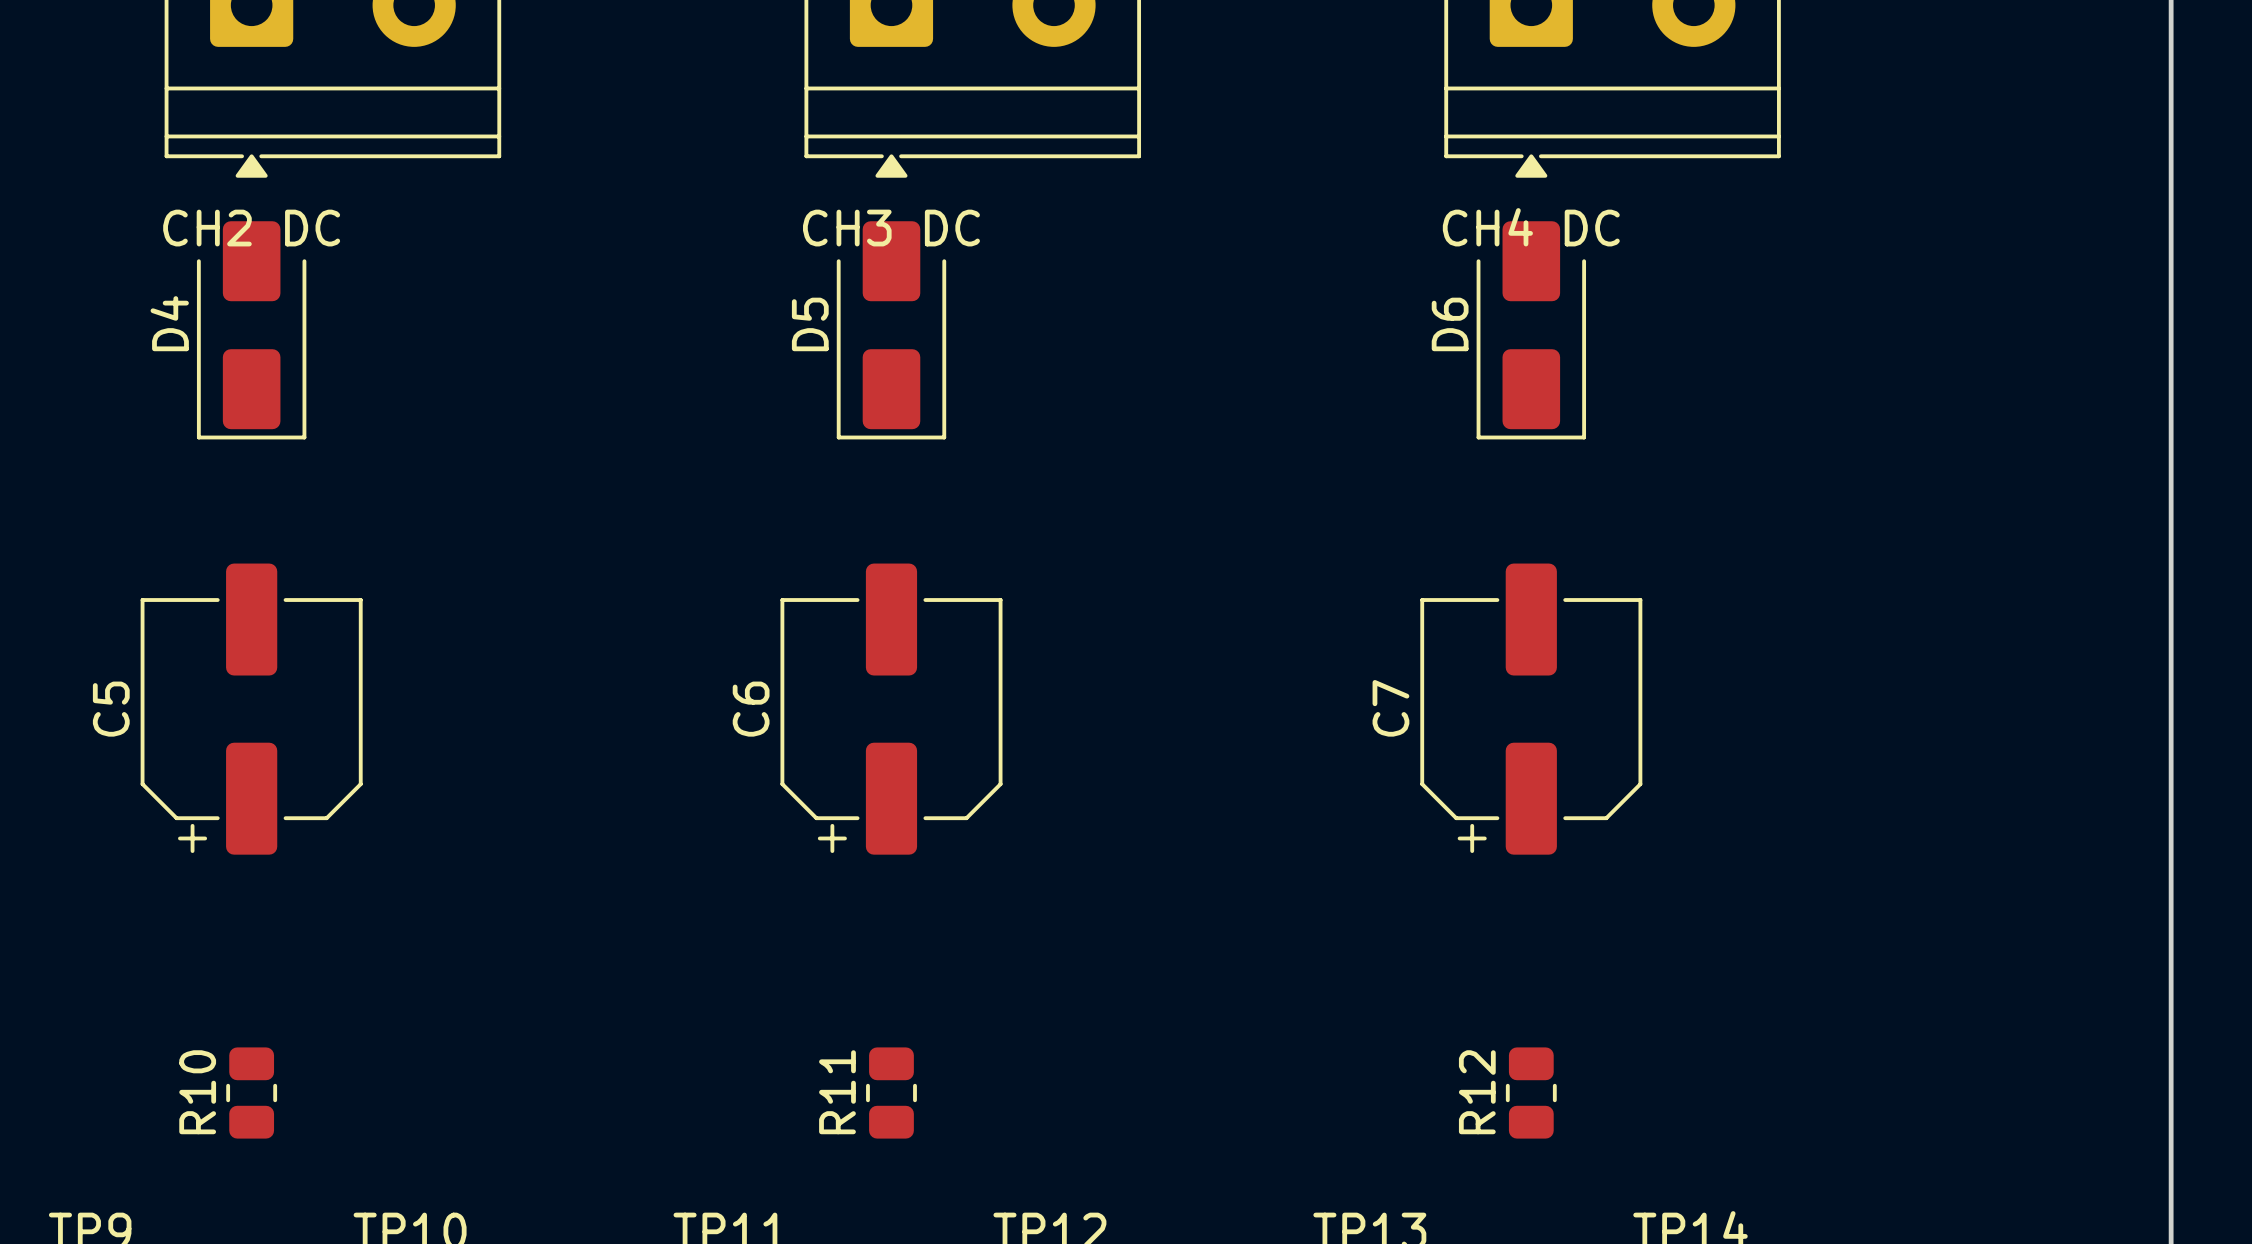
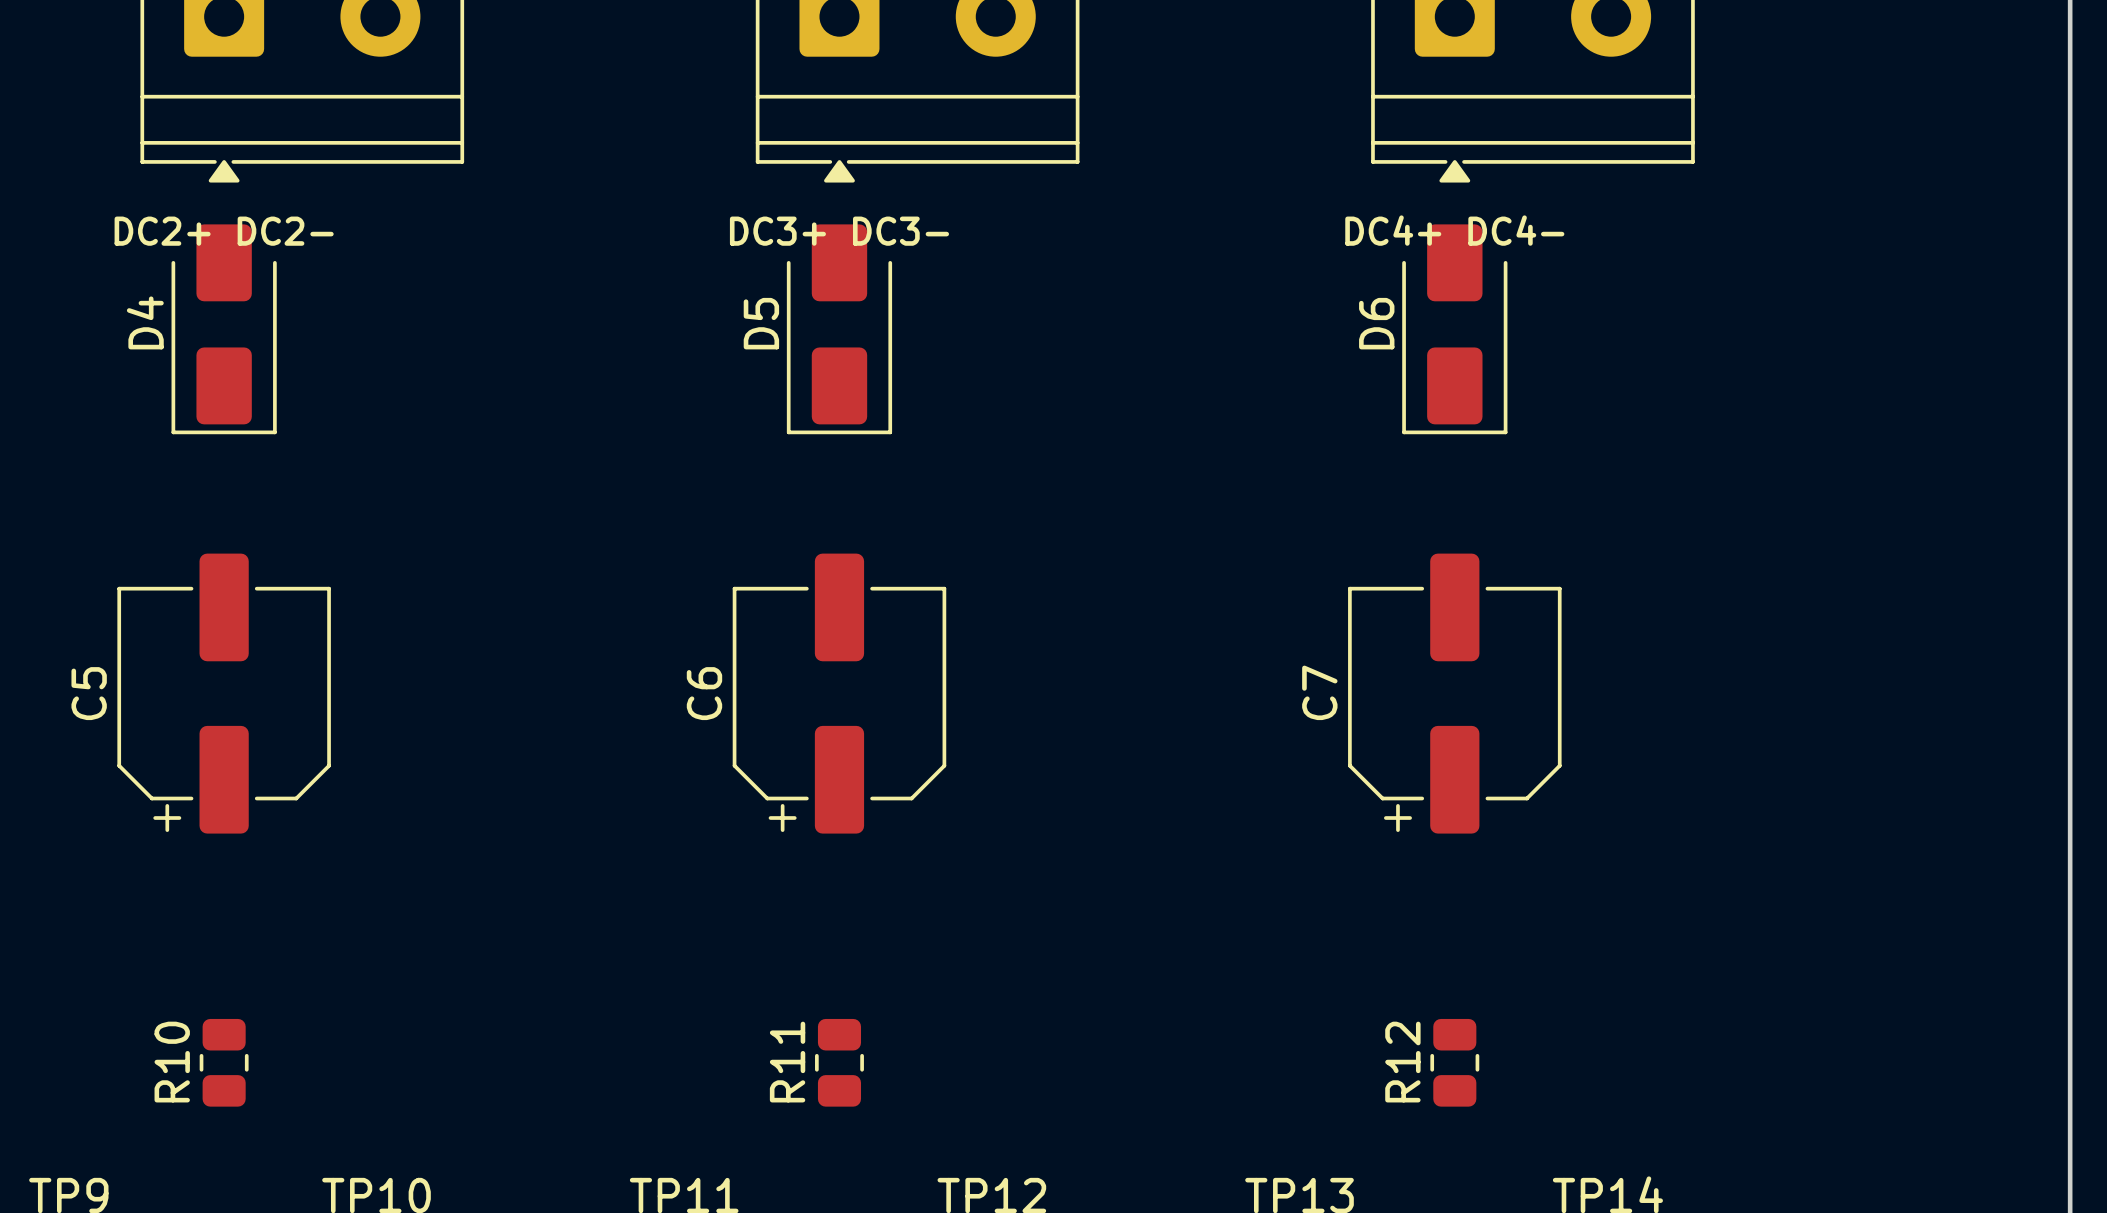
text: none -> DC4+ (1393, 230)
text: CH4 DC (1531, 227) -> none
text: none -> DC4- (1516, 230)
text: none -> DC2+ (162, 231)
text: CH2 DC (251, 228) -> none
text: none -> DC2- (285, 231)
text: none -> DC3+ (777, 231)
text: CH3 DC (891, 228) -> none
text: none -> DC3- (901, 231)

